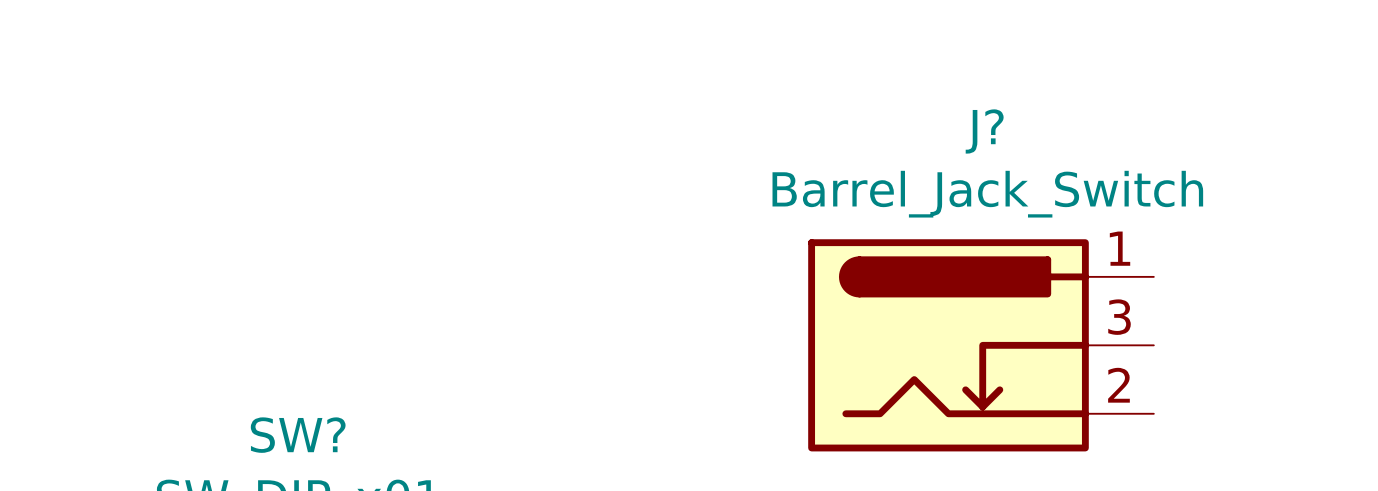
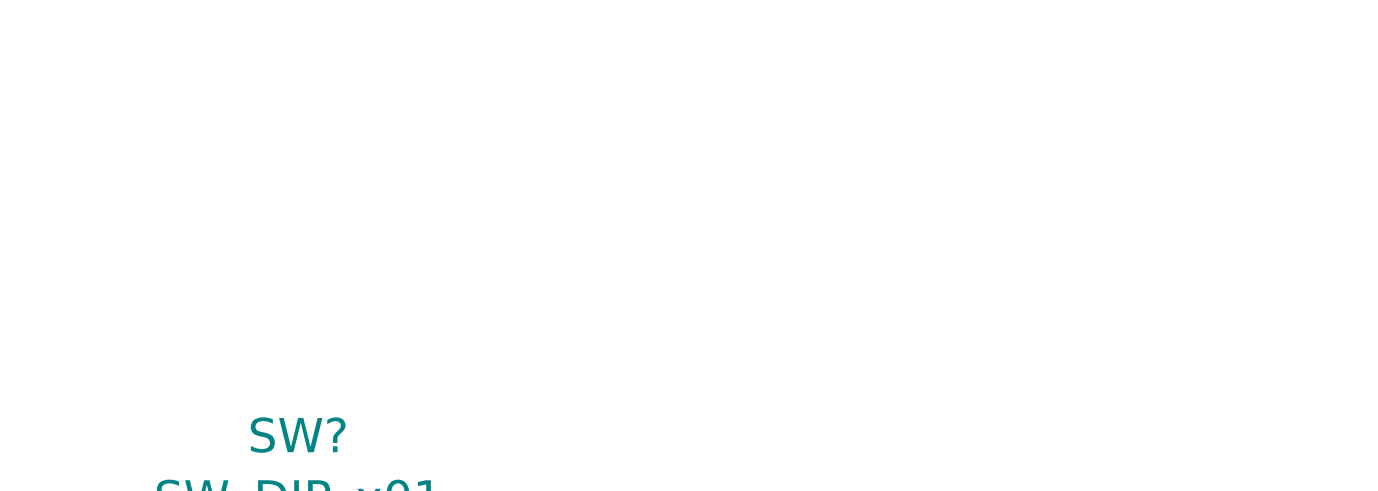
J?: Barrel_Jack_Switch (981, 345) -> none

